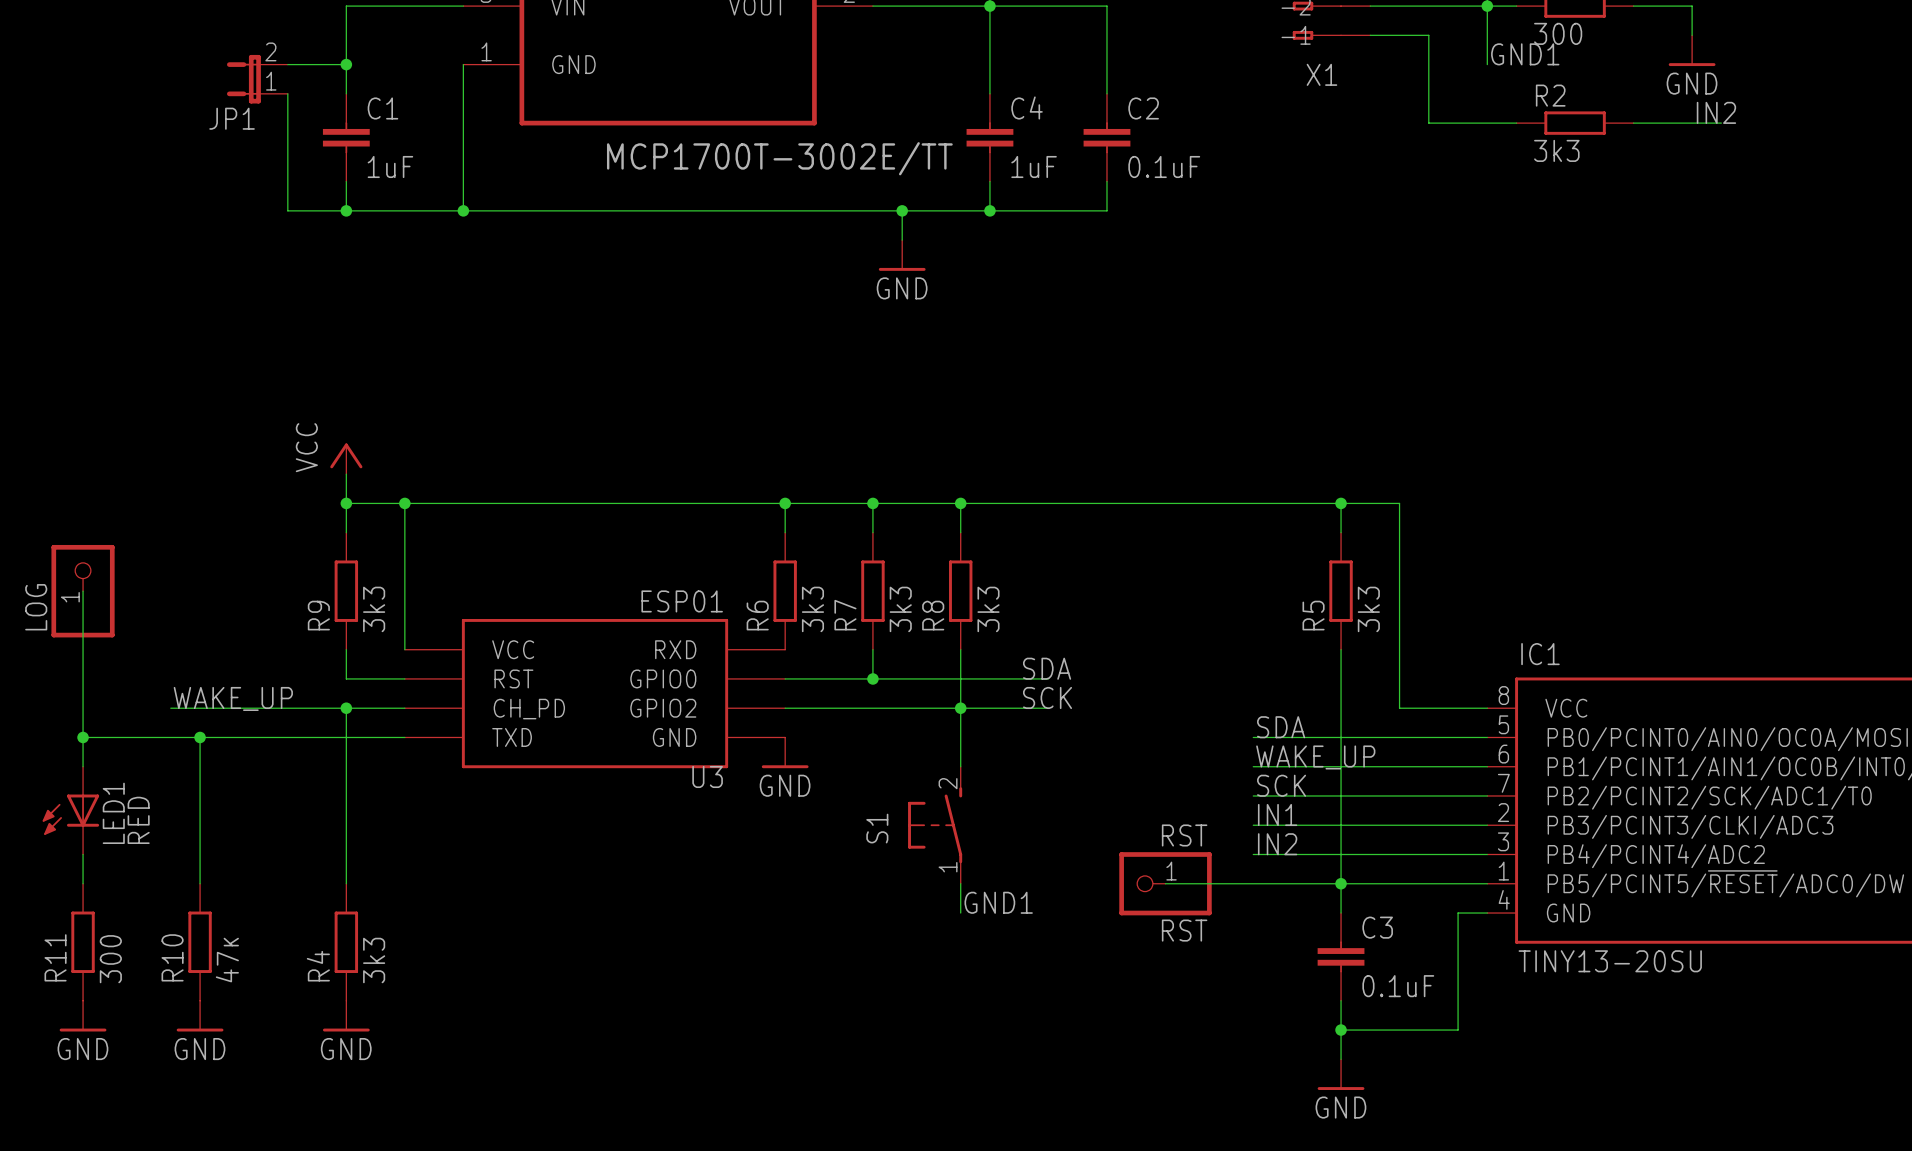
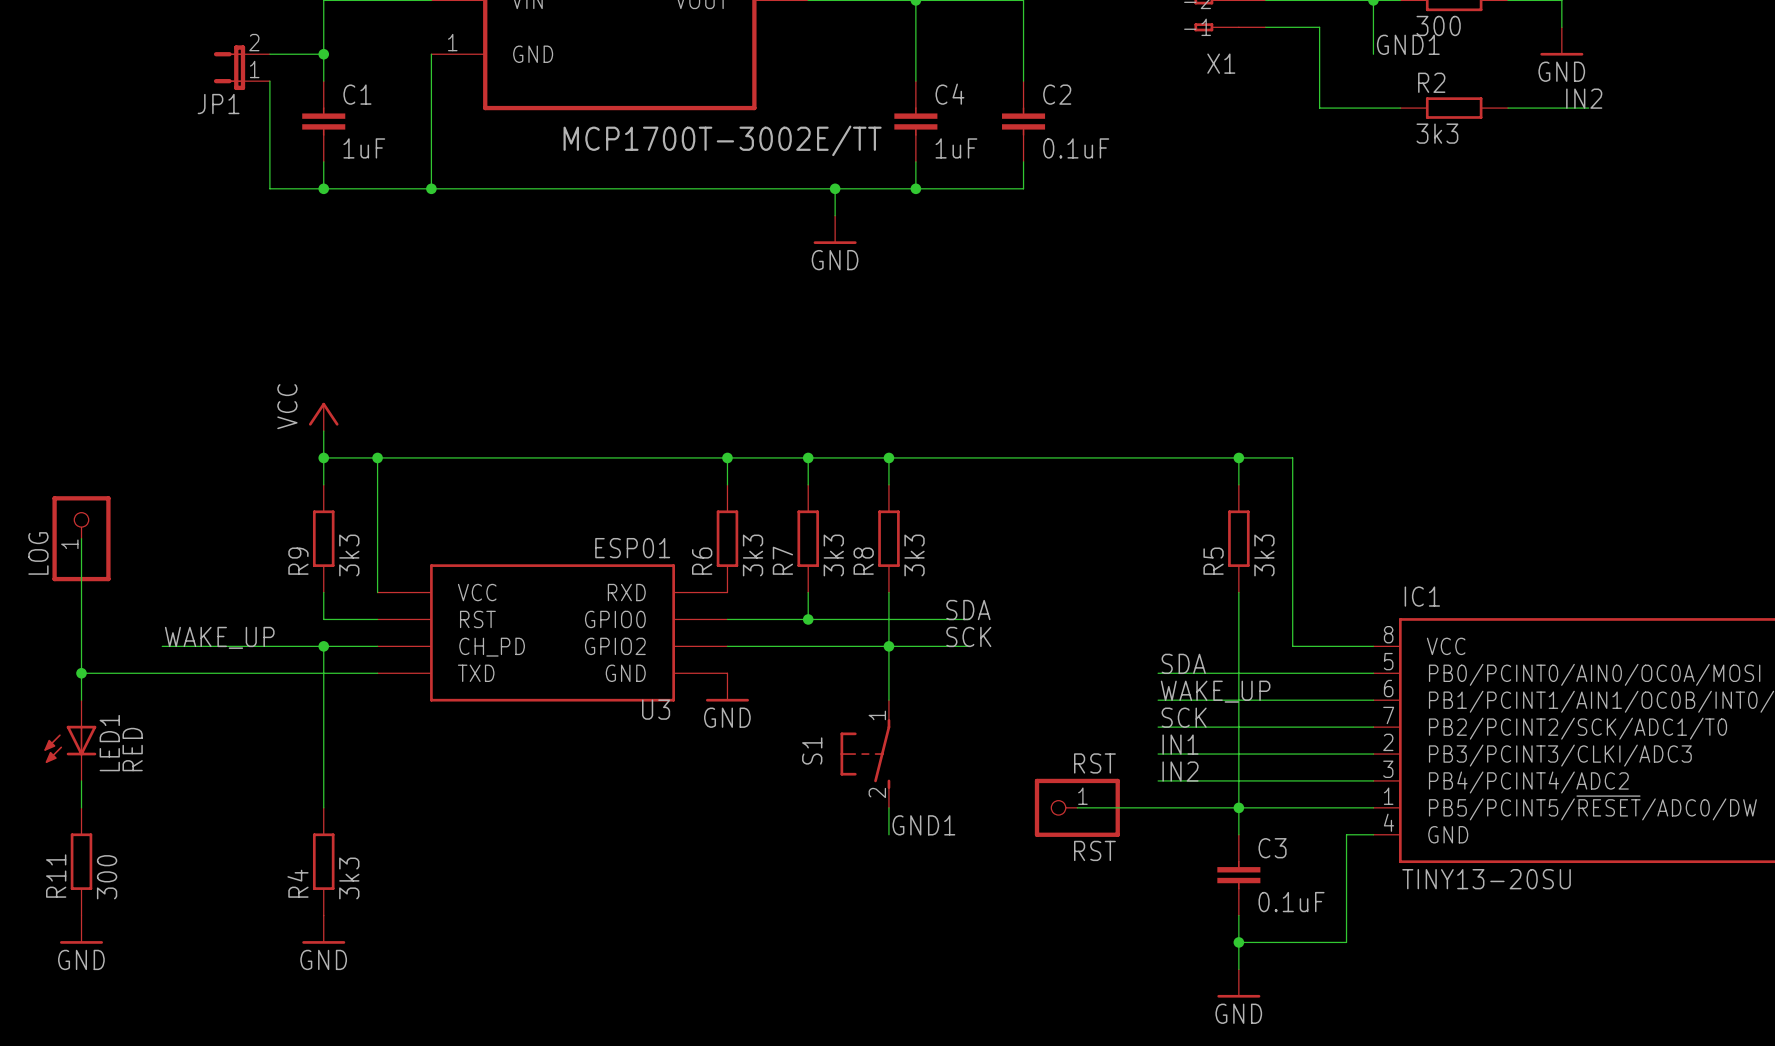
wire: (200, 737) (200, 883) -> none
junction: (200, 737) -> none
S1 flip: as is (935, 825) -> up-down (865, 754)
R10: 47к (200, 942) -> none
power symbol: GND (200, 1016) -> none

